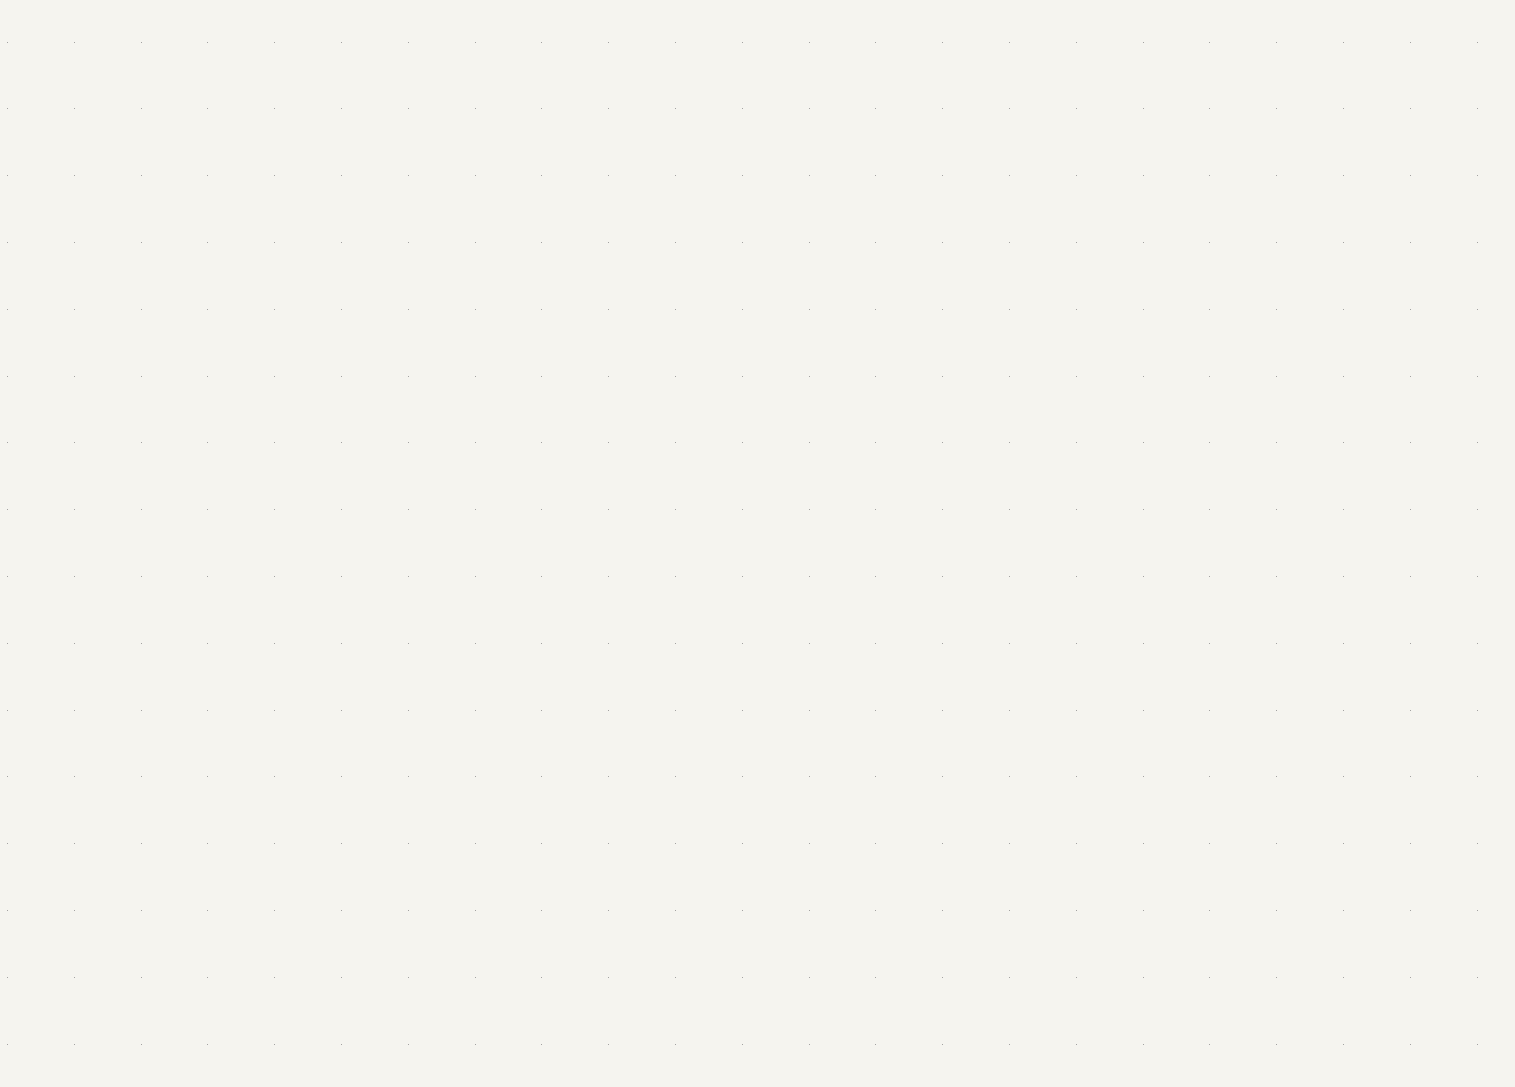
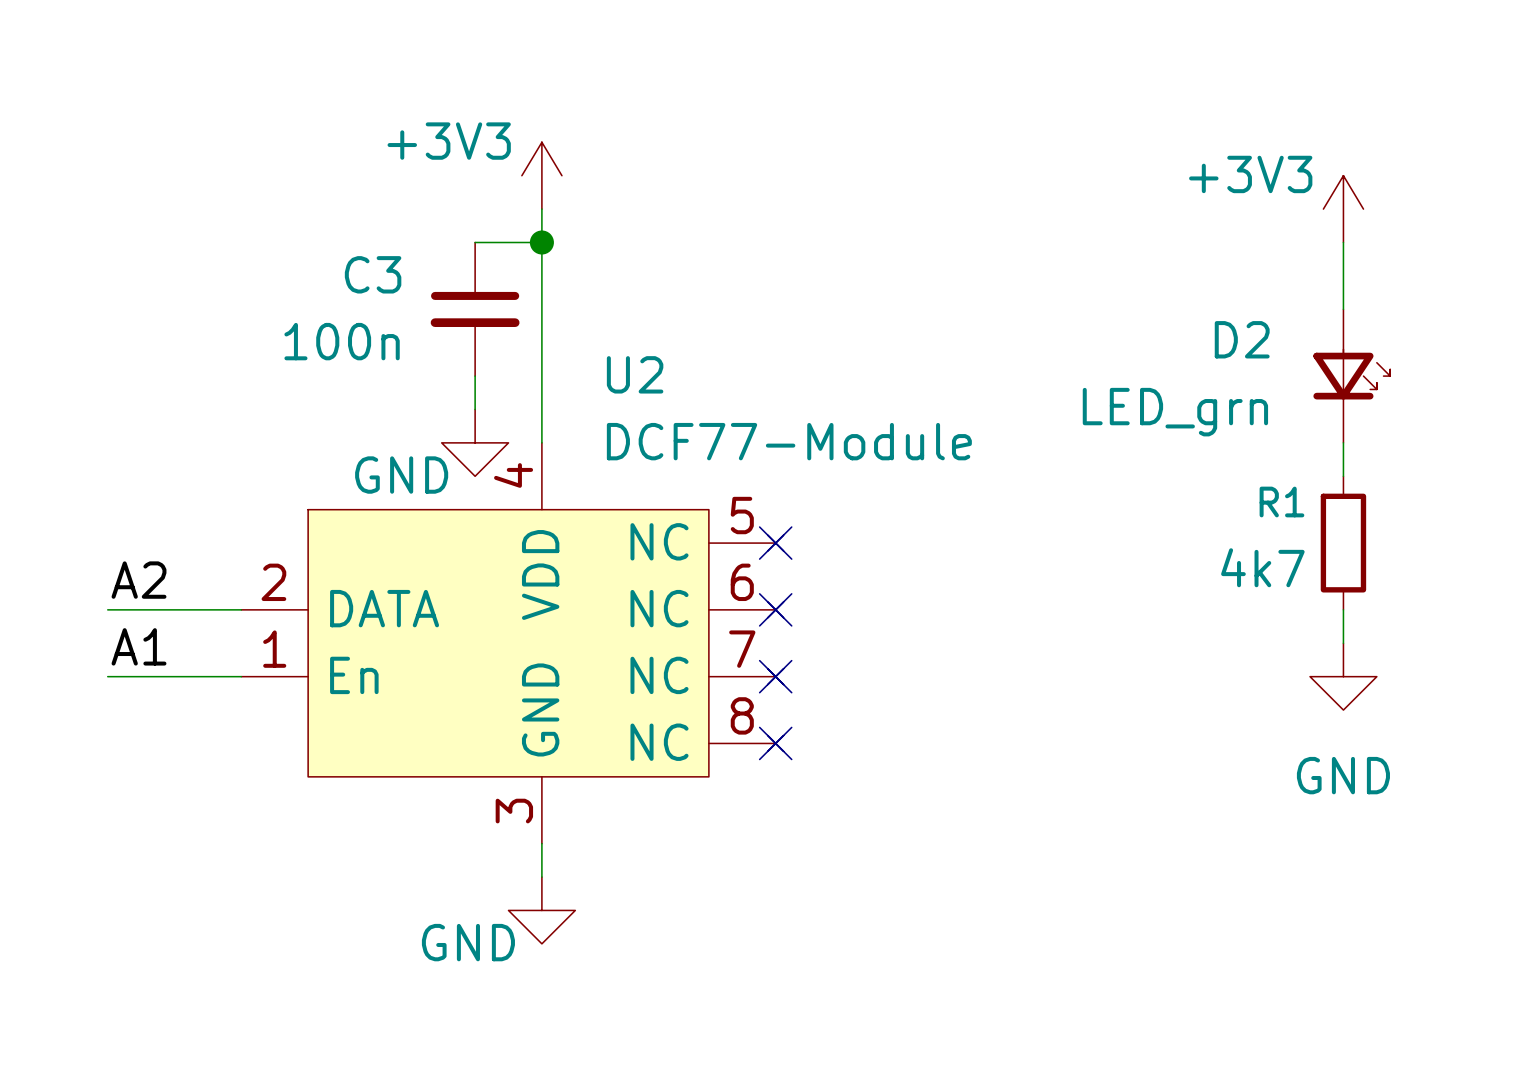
power symbol: none -> +3V3 (541, 175)
wire: none -> (541, 209) (541, 442)
power symbol: none -> +3V3 (1343, 209)
wire: none -> (475, 242) (541, 242)
junction: none -> (541, 242)
wire: none -> (1343, 242) (1343, 309)
C3: none -> 100n (475, 309)
wire: none -> (475, 376) (475, 409)
D2: none -> LED_grn (1351, 376)
power symbol: none -> GND (475, 442)
wire: none -> (1343, 442) (1343, 476)
no-connect mark: none -> (775, 543)
R1: none -> 4k7 (1343, 543)
label: none -> A2 (139, 580)
wire: none -> (107, 609) (241, 609)
no-connect mark: none -> (775, 609)
wire: none -> (1343, 609) (1343, 643)
U2: none -> DCF77-Module (512, 643)
label: none -> A1 (139, 646)
wire: none -> (107, 676) (241, 676)
no-connect mark: none -> (775, 676)
power symbol: none -> GND (1343, 676)
no-connect mark: none -> (775, 743)
wire: none -> (541, 843) (541, 877)
power symbol: none -> GND (541, 910)

